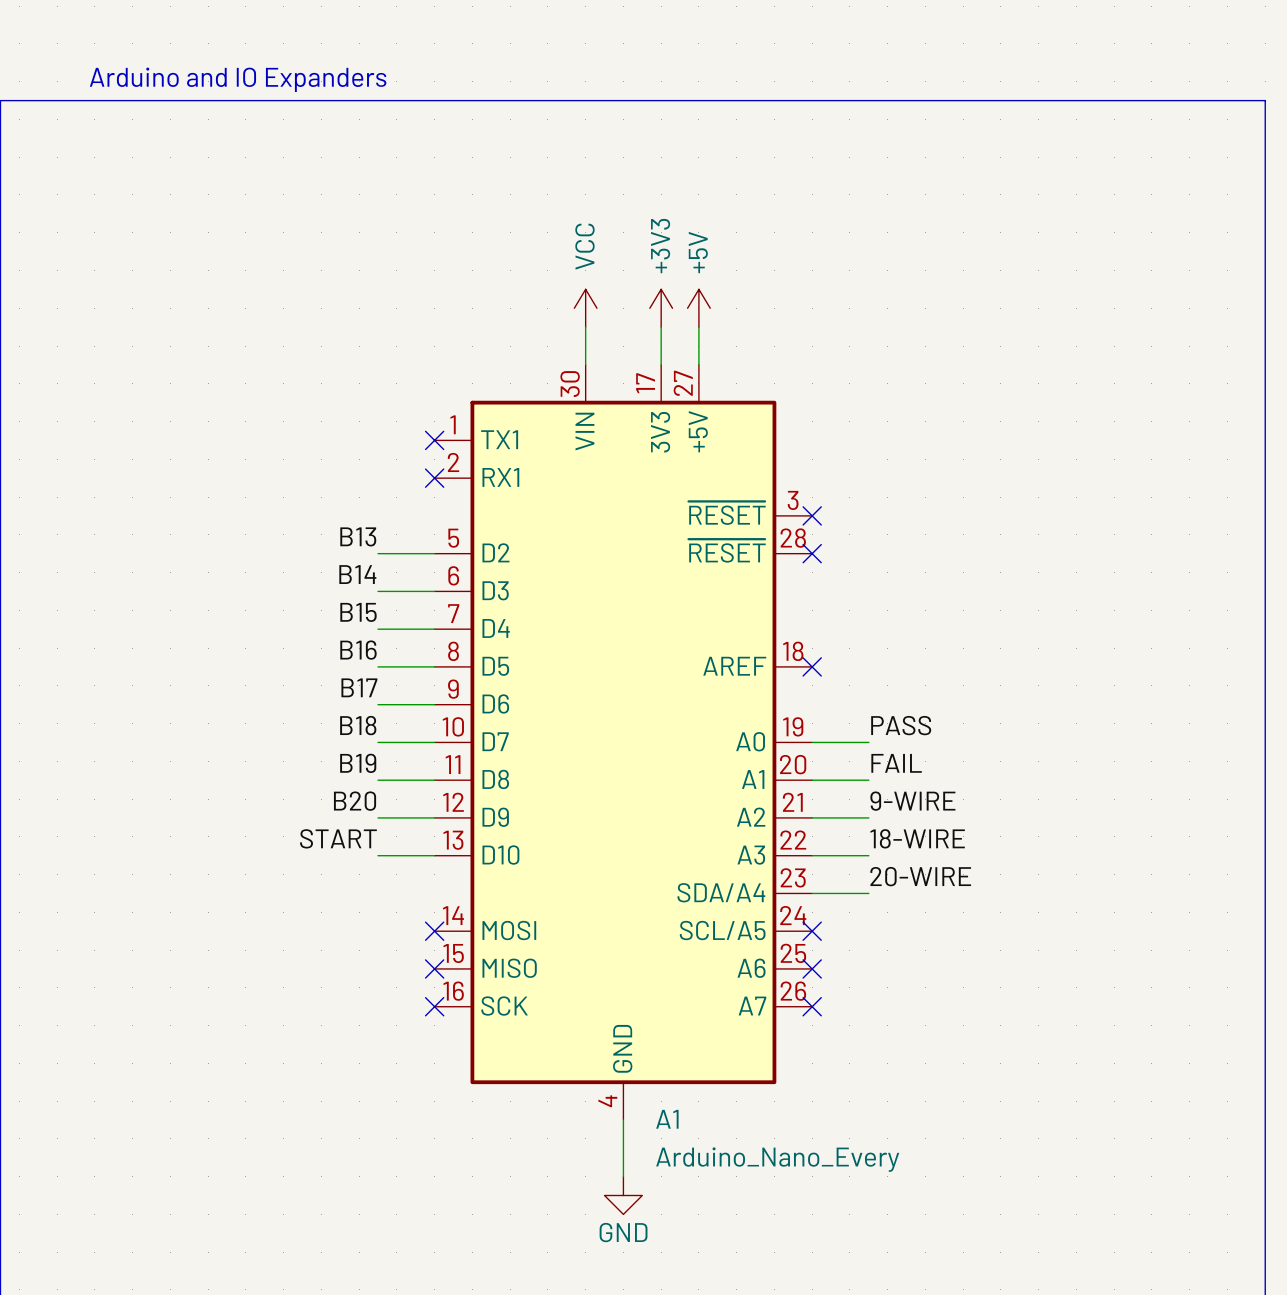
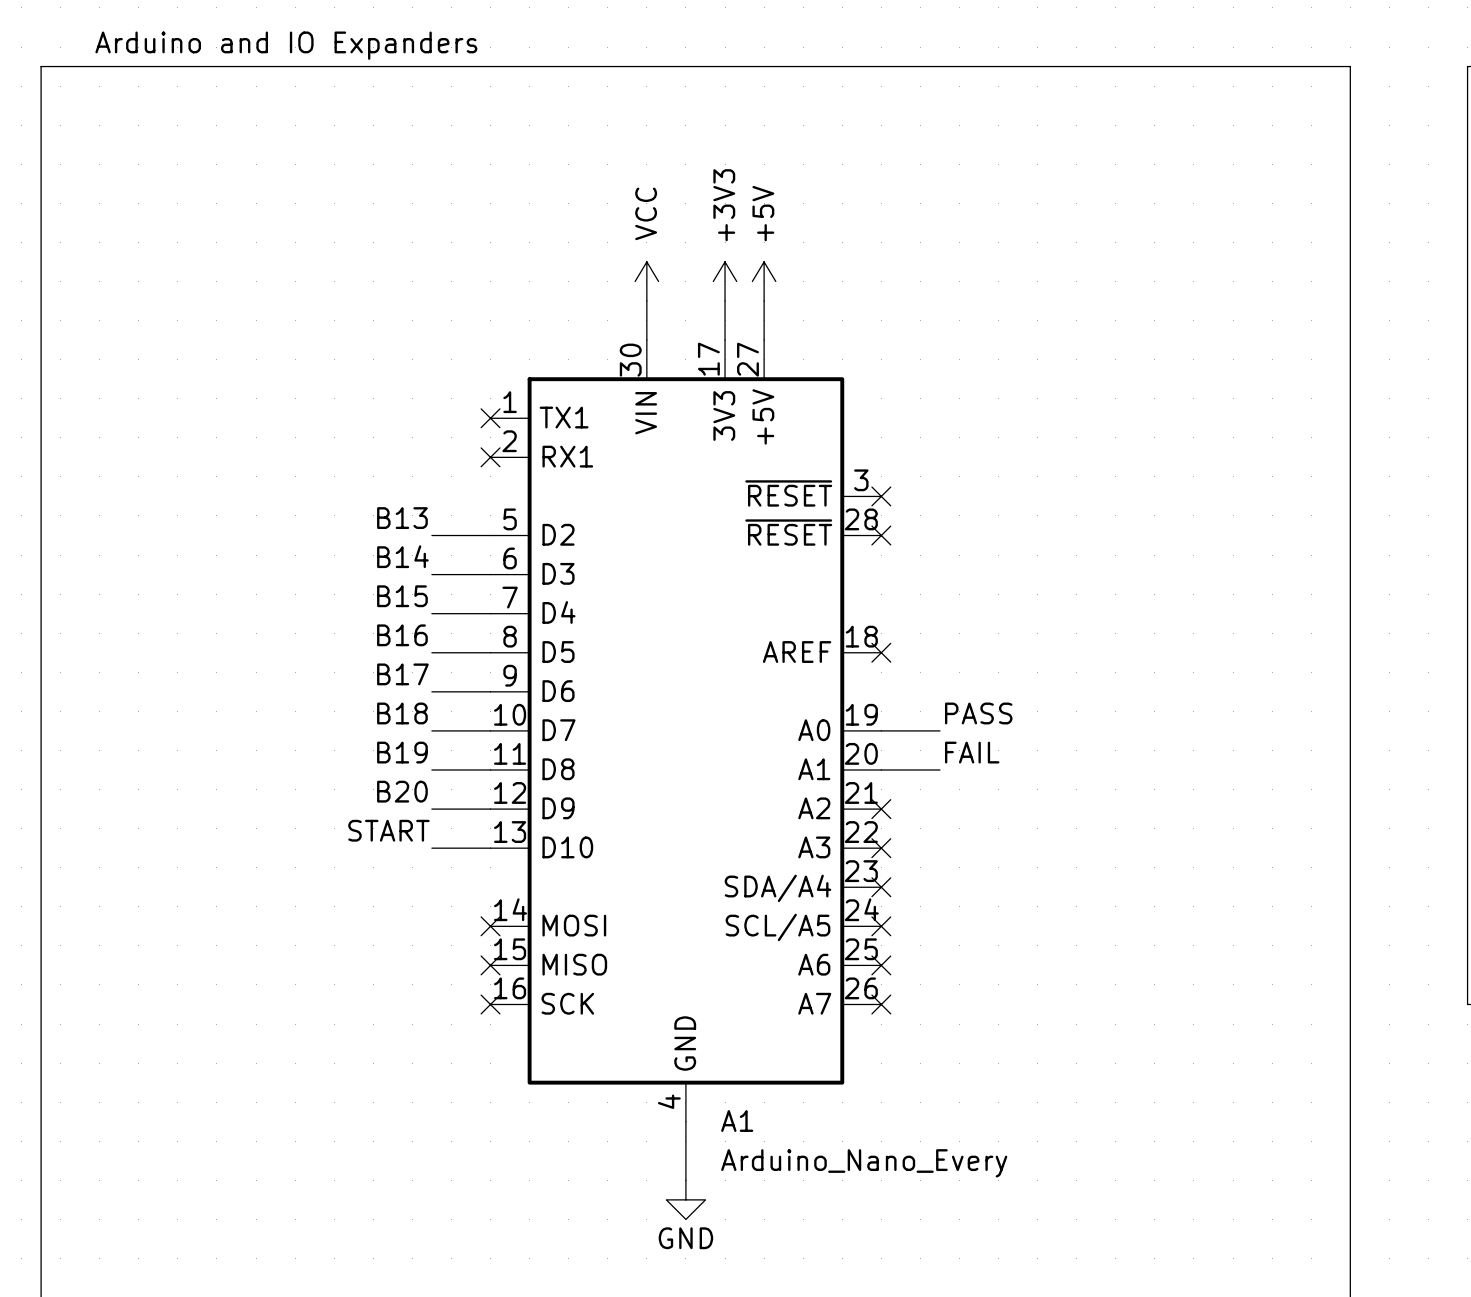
label: 9-WIRE (912, 801) -> none
wire: (812, 817) (868, 817) -> none
no-connect mark: none -> (881, 809)
label: 18-WIRE (917, 838) -> none
wire: (812, 855) (868, 855) -> none
no-connect mark: none -> (881, 848)
label: 20-WIRE (920, 876) -> none
wire: (812, 893) (868, 893) -> none
no-connect mark: none -> (881, 887)

